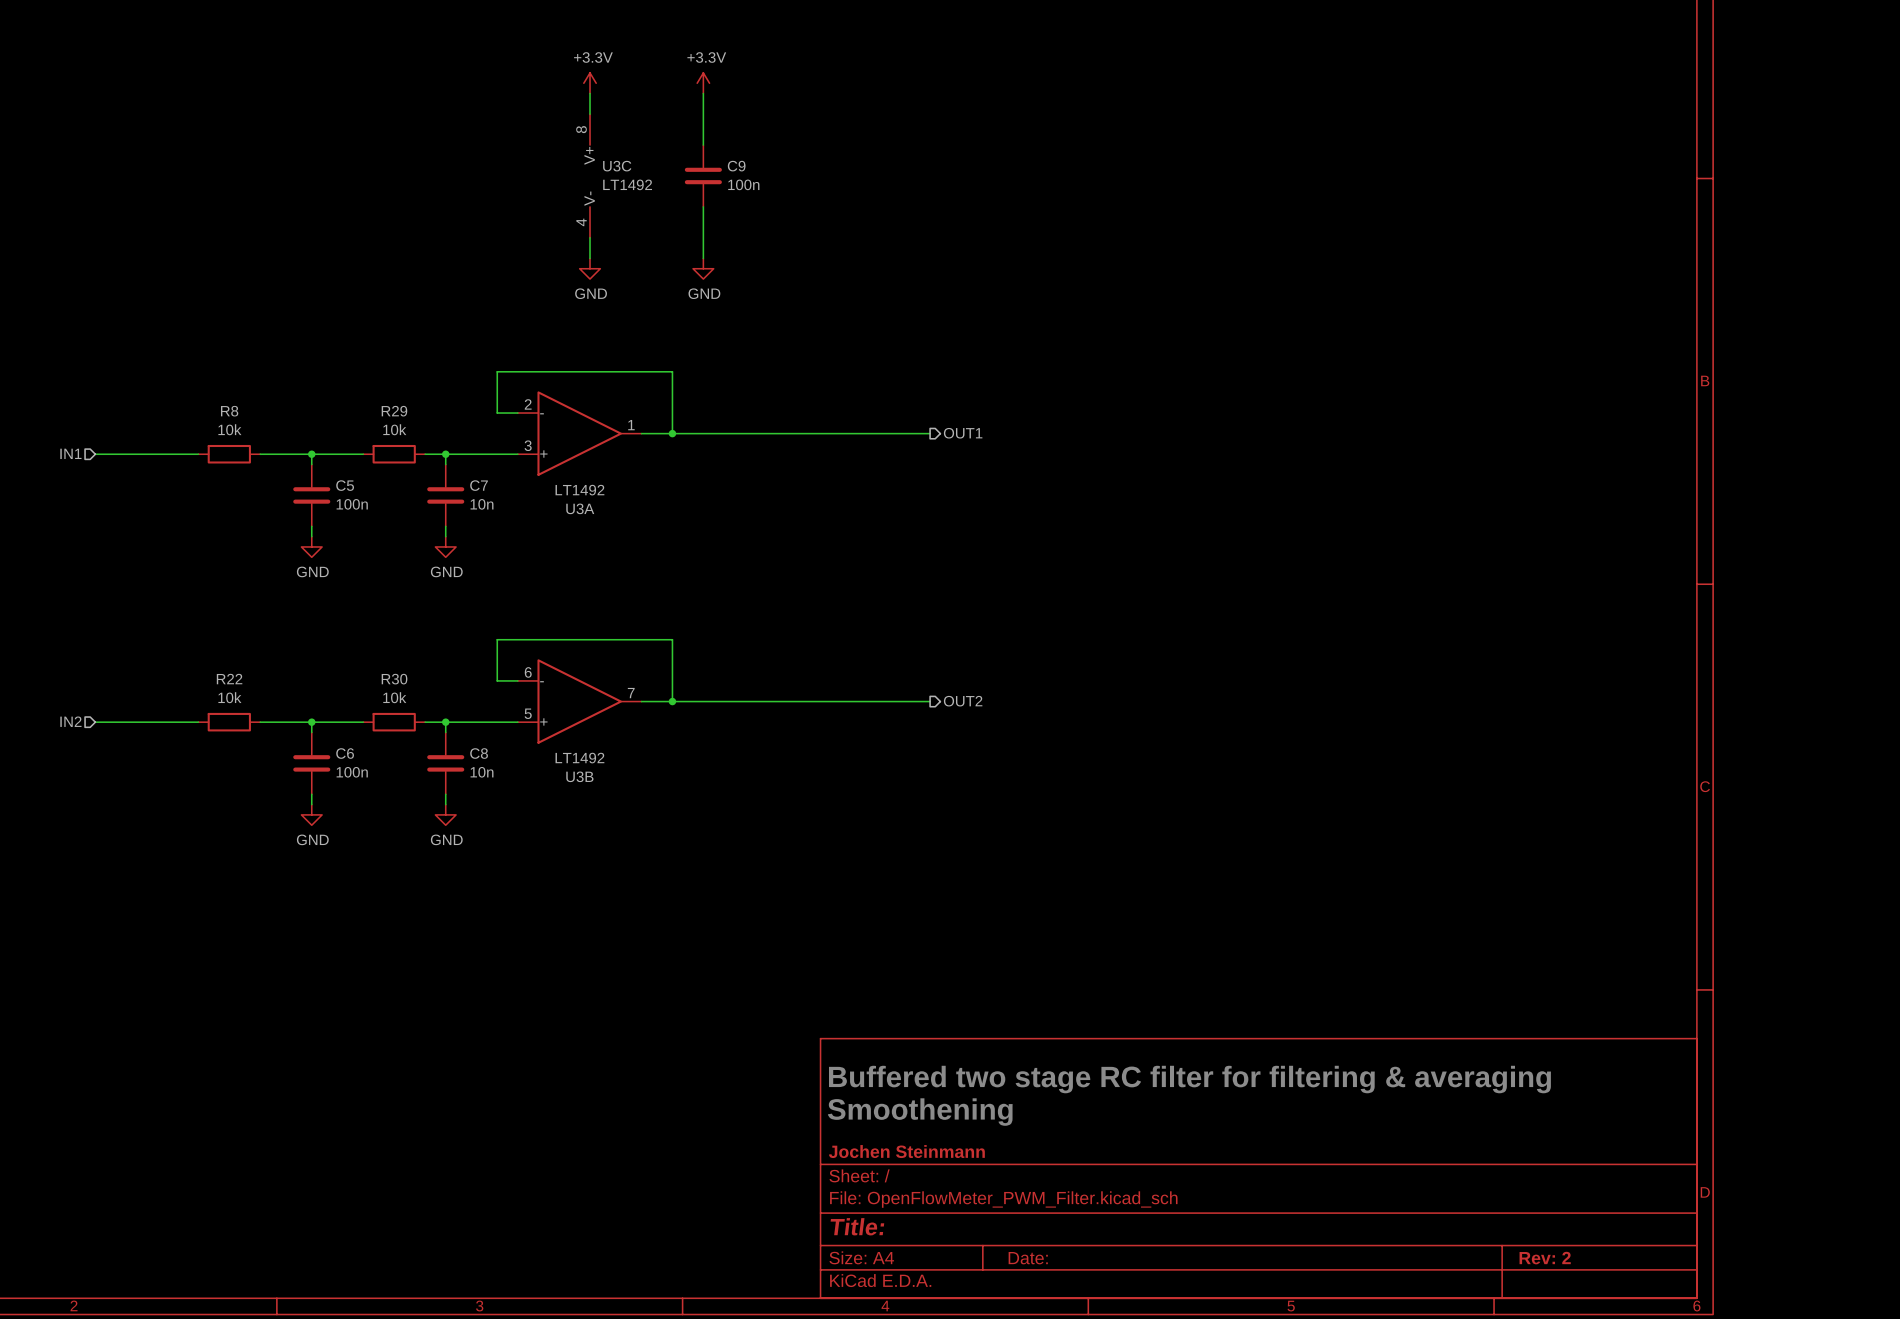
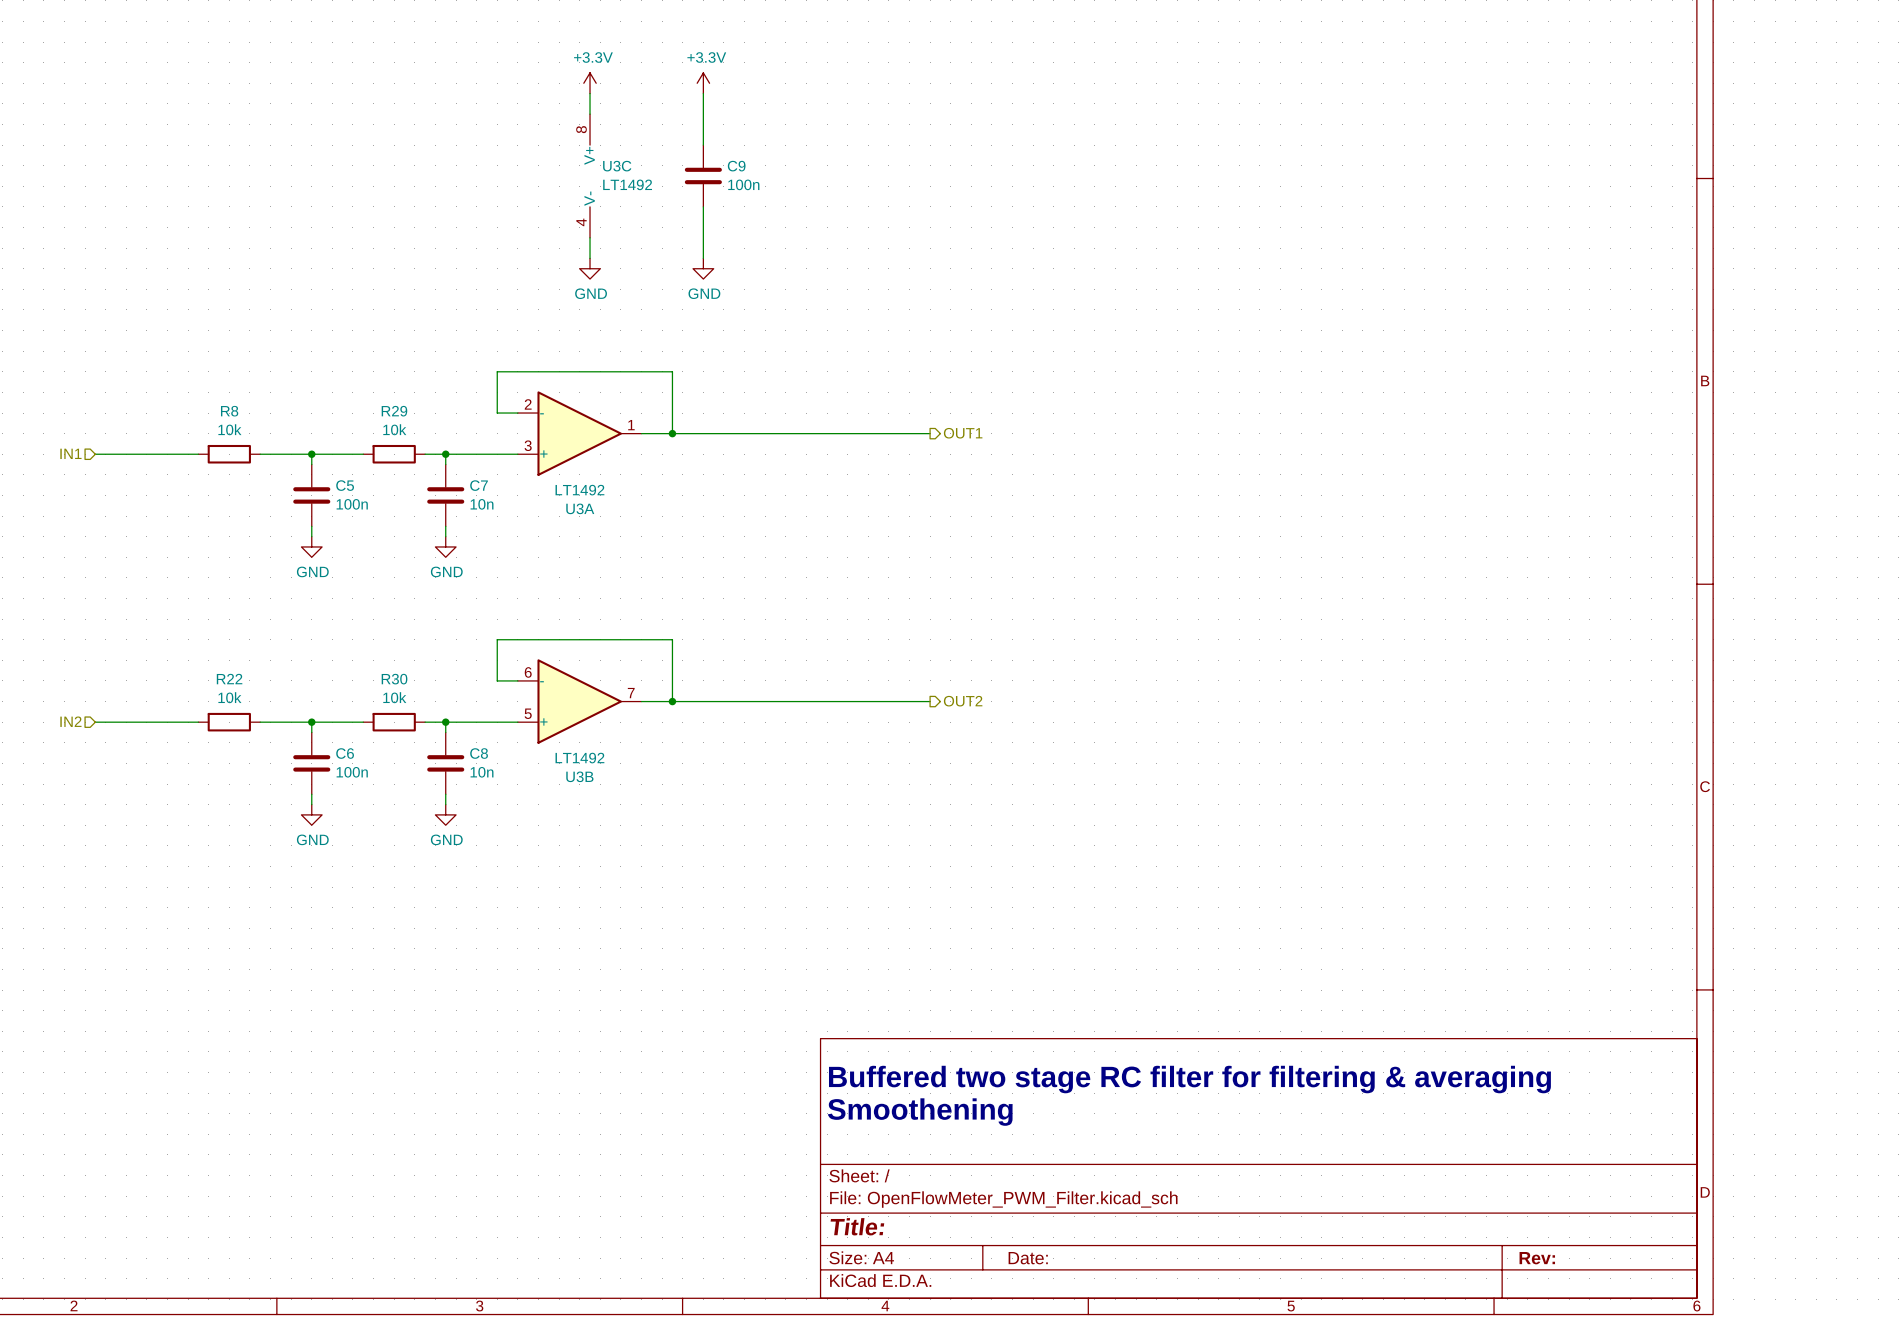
title block: Jochen Steinmann (906, 1151) -> none
title block: Rev: 2 (1545, 1258) -> Rev: (1537, 1258)

